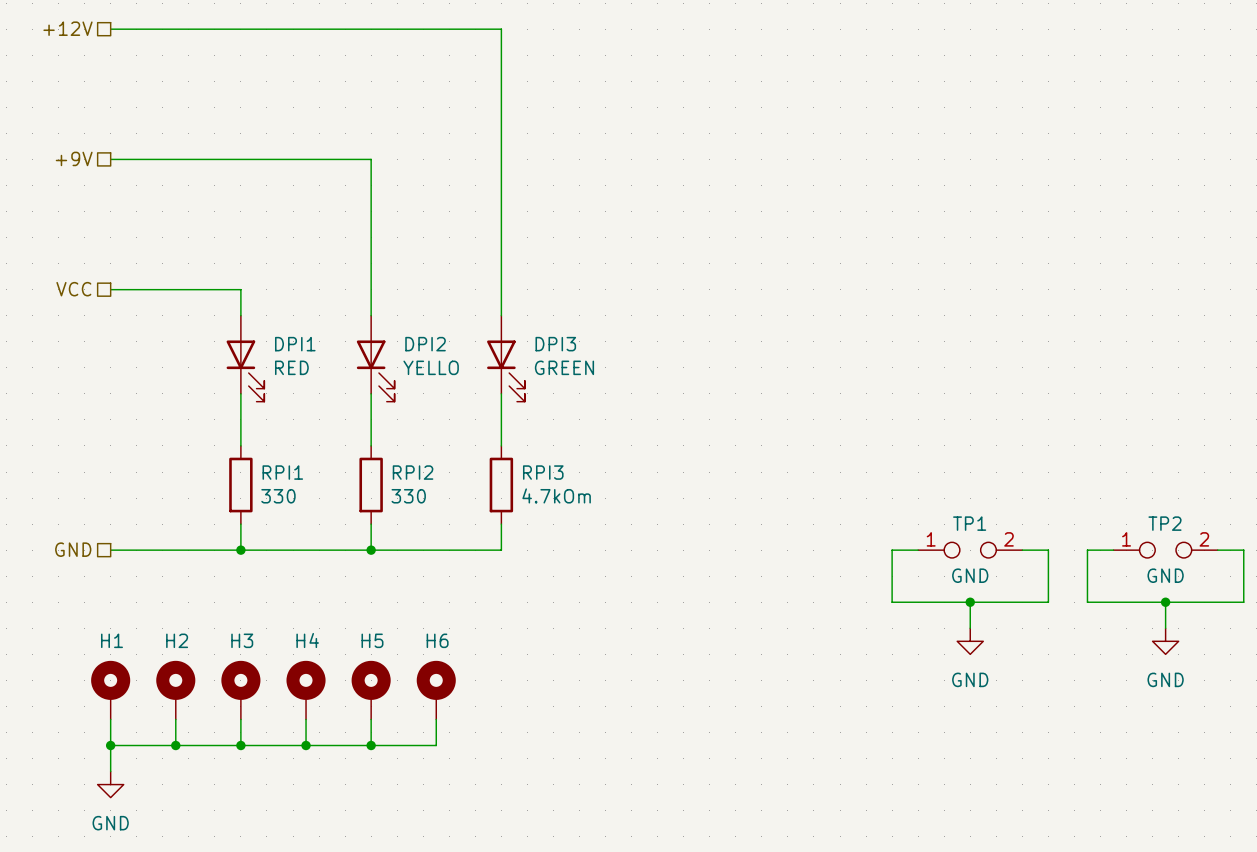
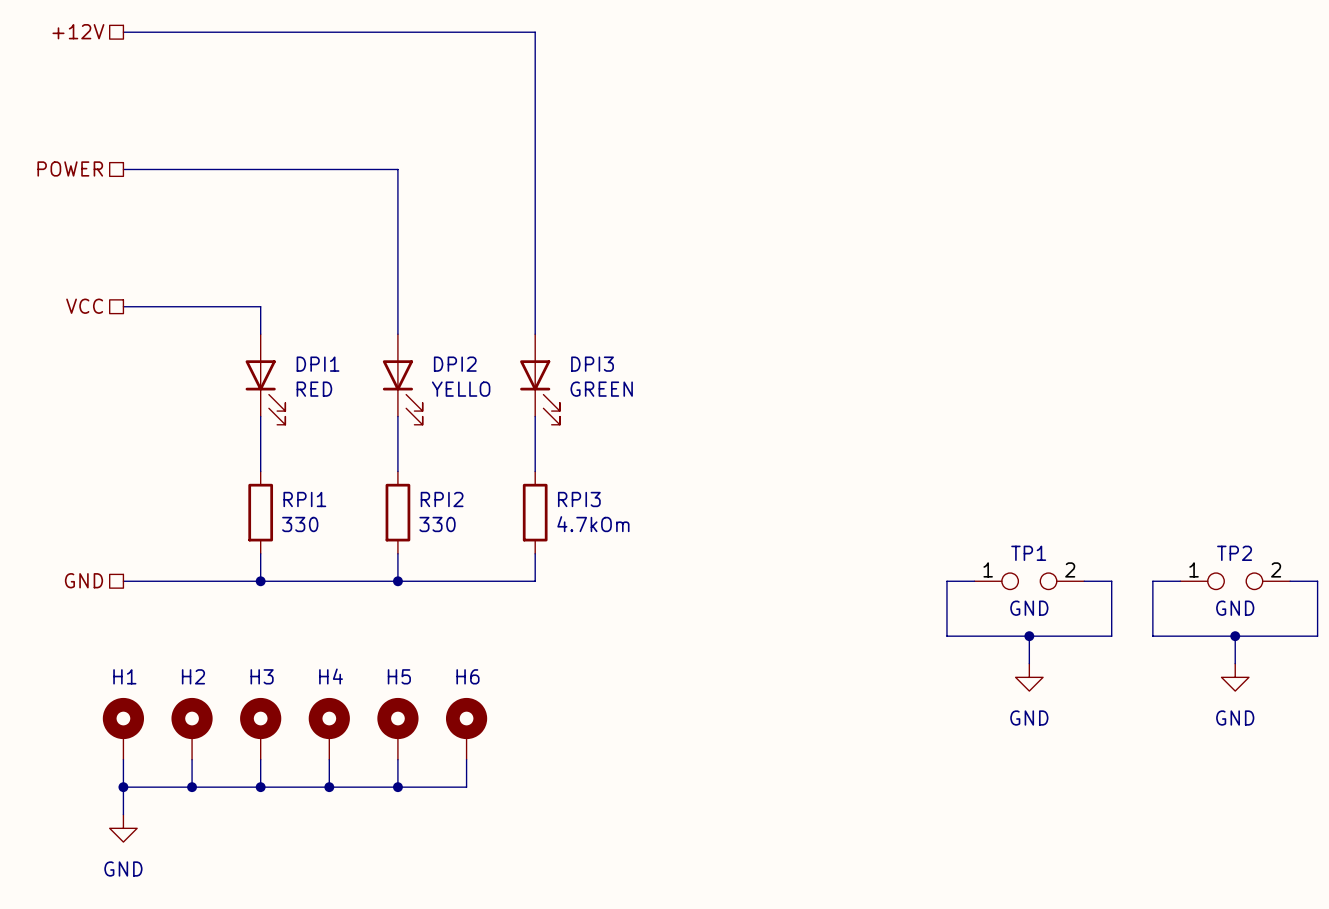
hierarchical label: +9V (74, 158) -> POWER (70, 168)

